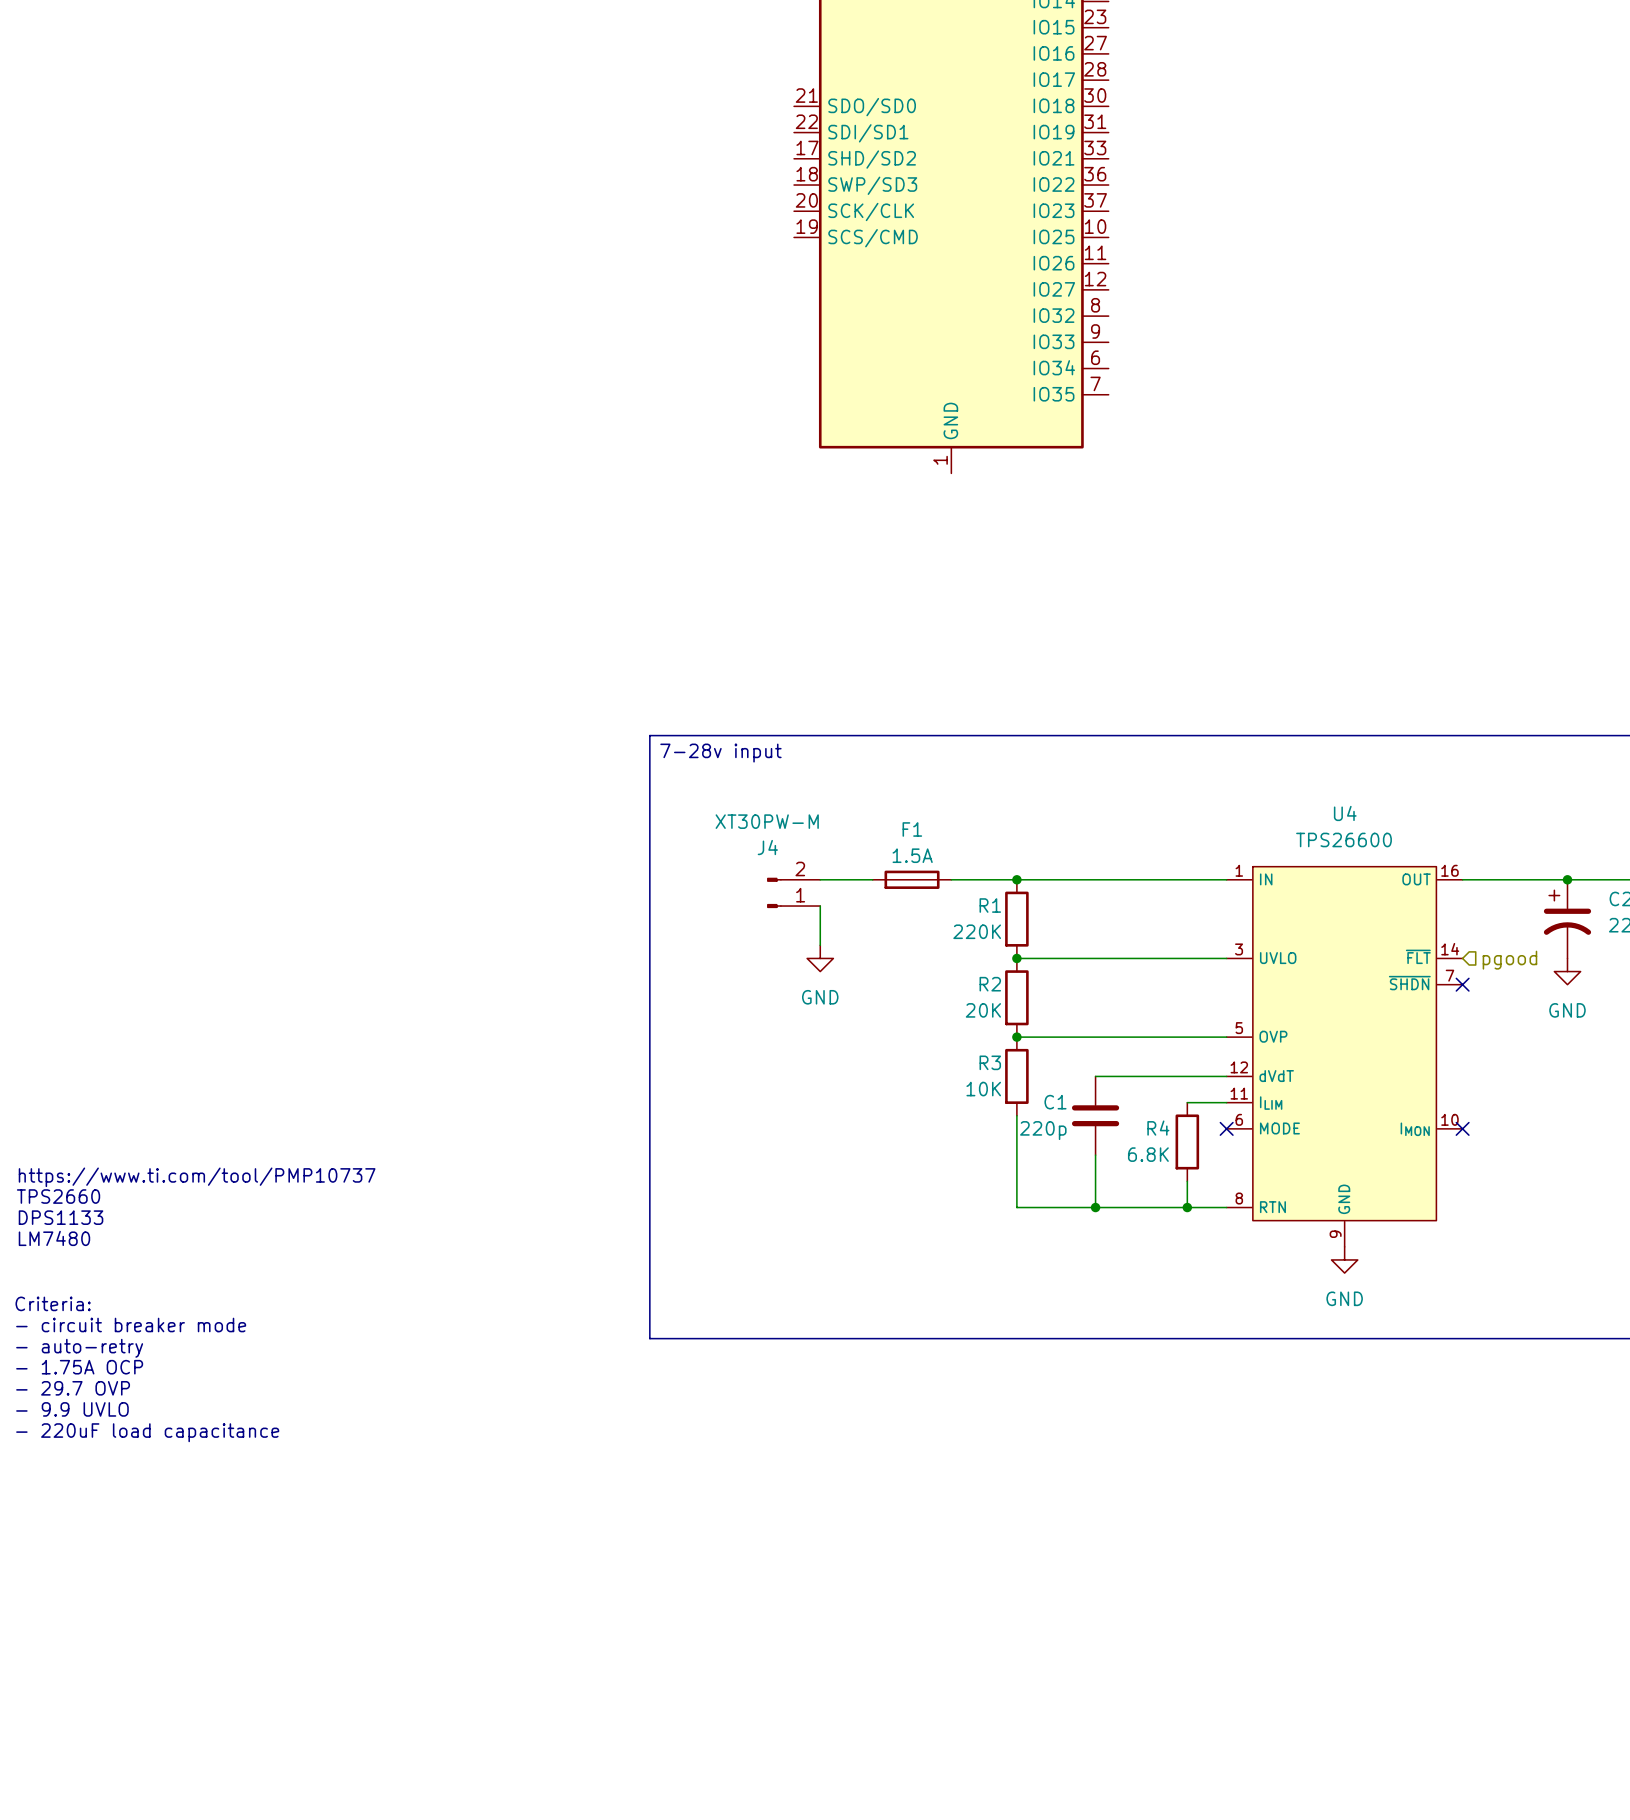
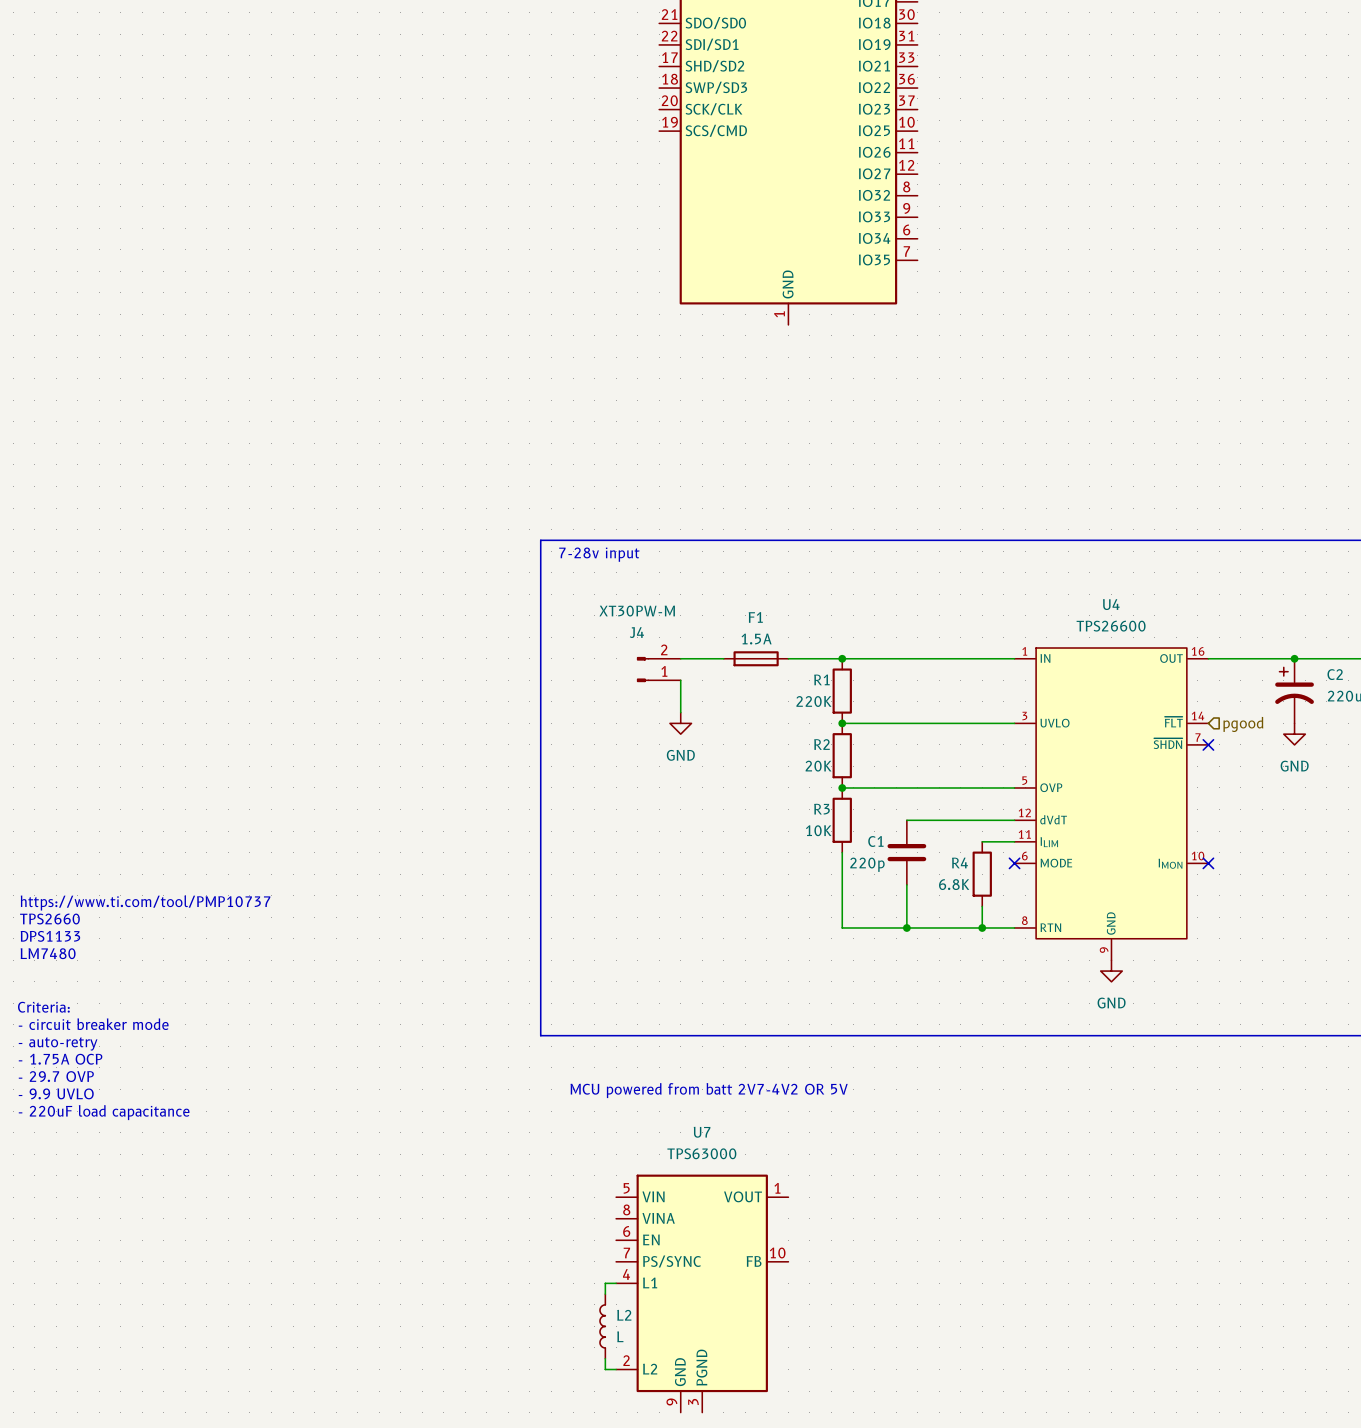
text: none -> MCU powered from batt 2V7-4V2 OR 5V (709, 1090)
wire: none -> (616, 1283) (605, 1283) (605, 1294)
U7: none -> TPS63000 (702, 1293)
L2: none -> L (602, 1326)
wire: none -> (605, 1358) (605, 1369) (616, 1369)

